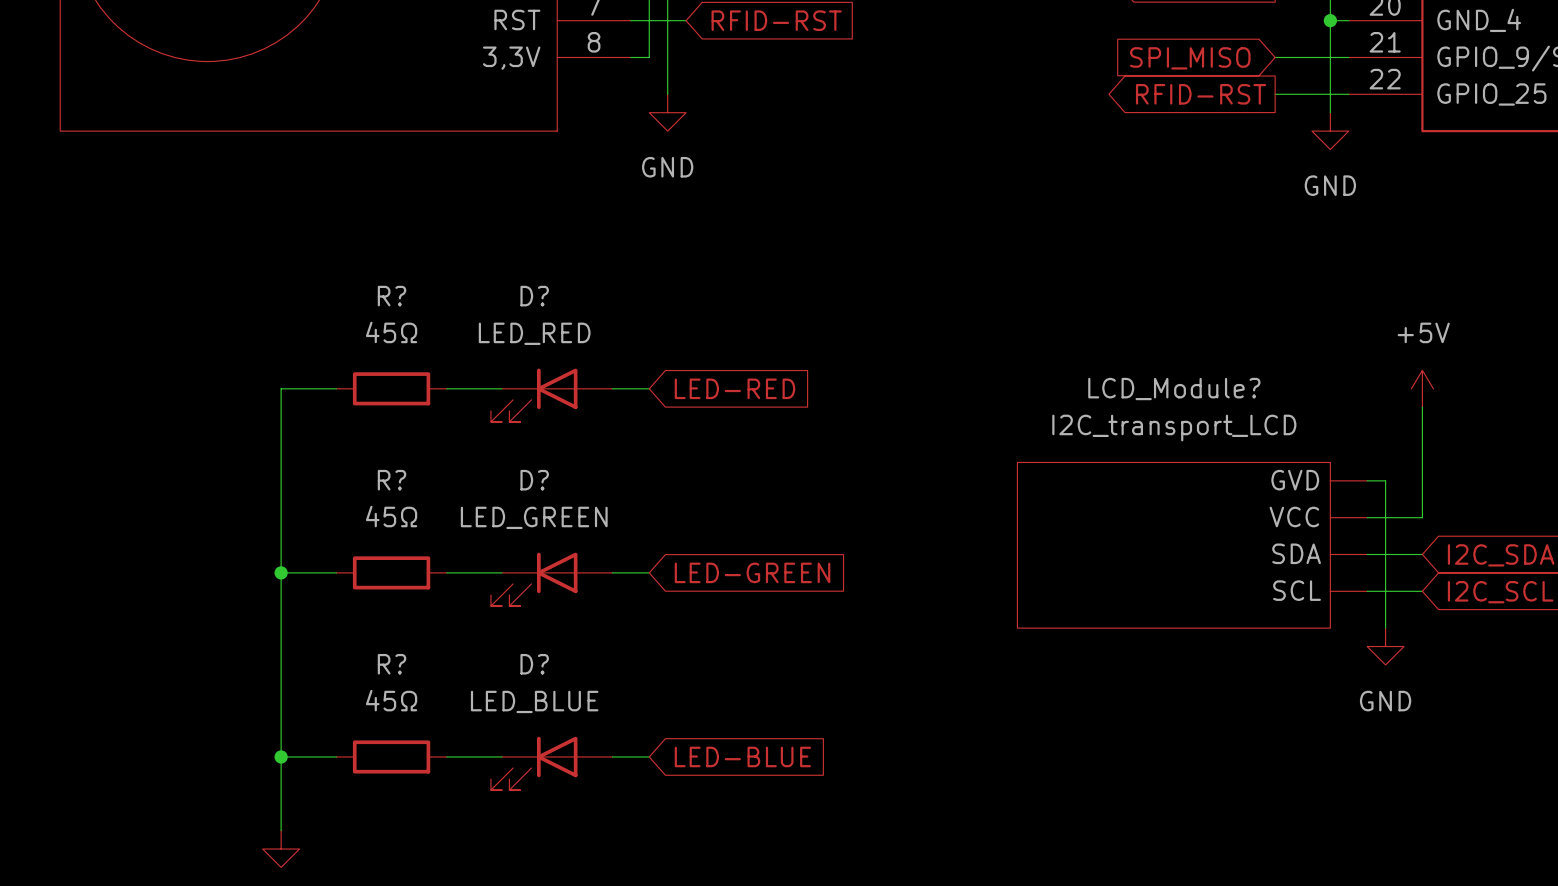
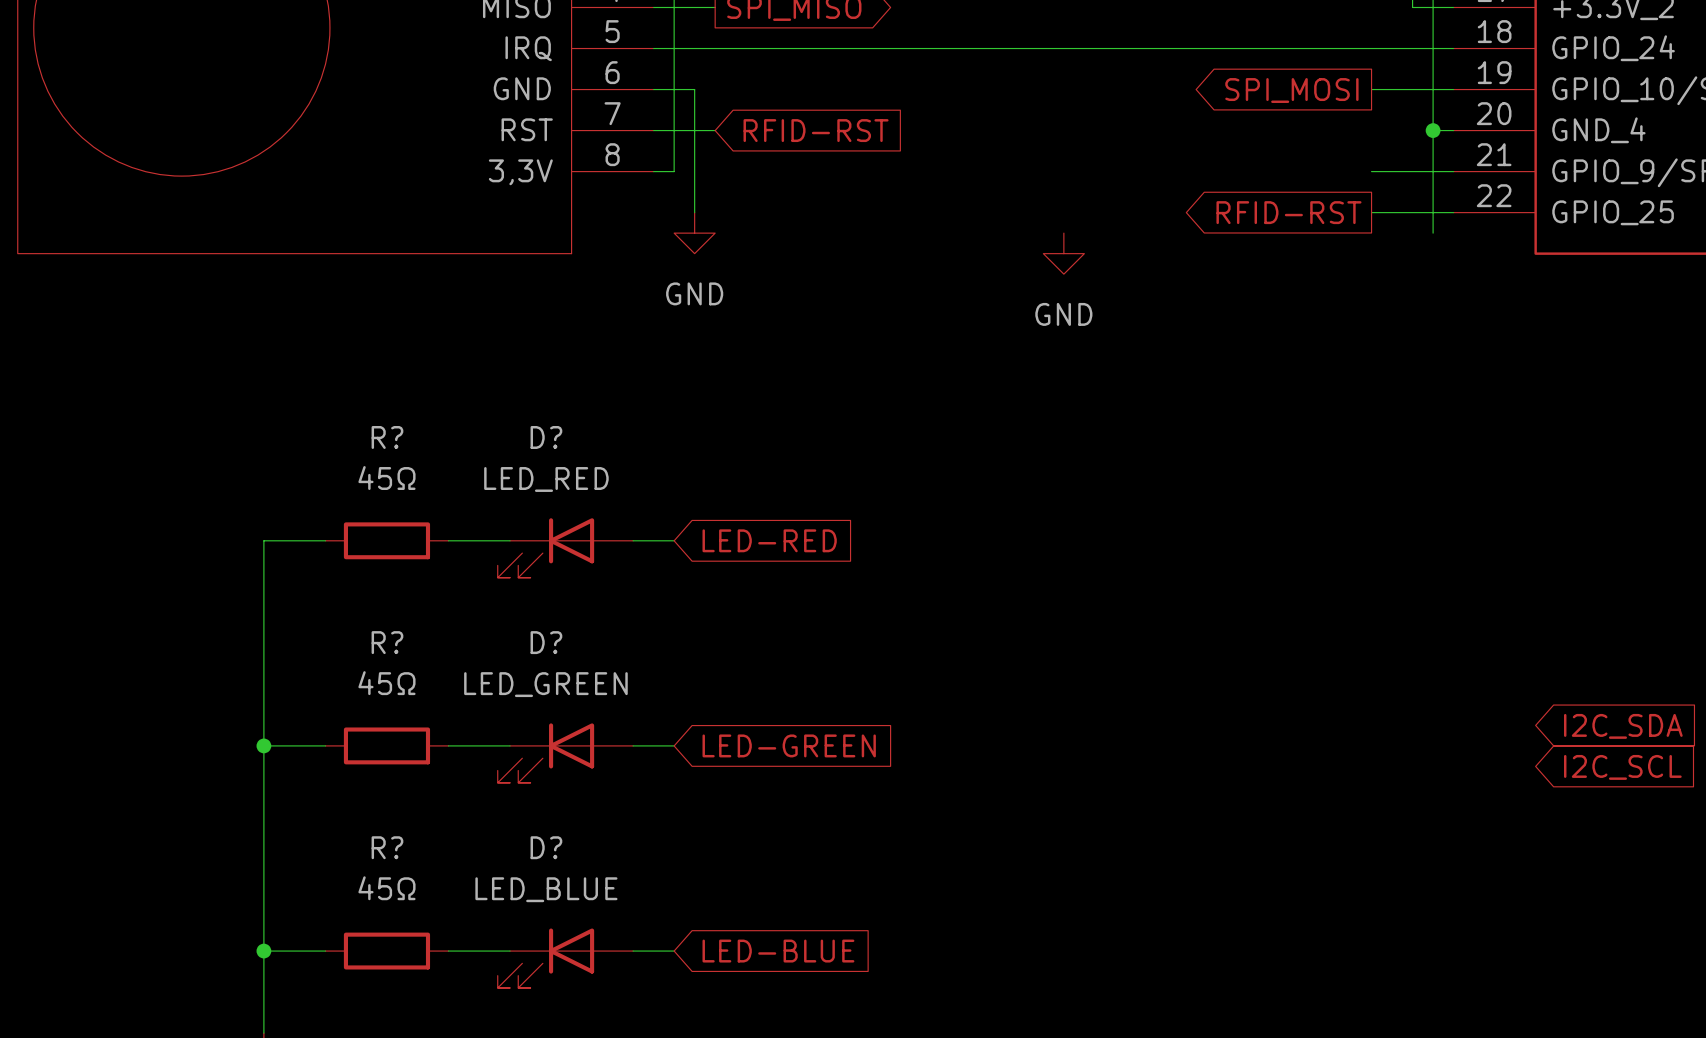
global label: SPI_MISO (1190, 58) -> none
power symbol: none -> GND (1063, 253)
power symbol: GND (1330, 131) -> none
power symbol: +5V (1422, 388) -> none
wire: (1422, 407) (1422, 517) (1367, 517) -> none
wire: (1367, 480) (1385, 480) (1385, 628) -> none
LCD_Module?: I2C_transport_LCD (1192, 545) -> none
wire: (1367, 554) (1422, 554) -> none
wire: (1367, 591) (1422, 591) -> none
power symbol: GND (1385, 646) -> none

